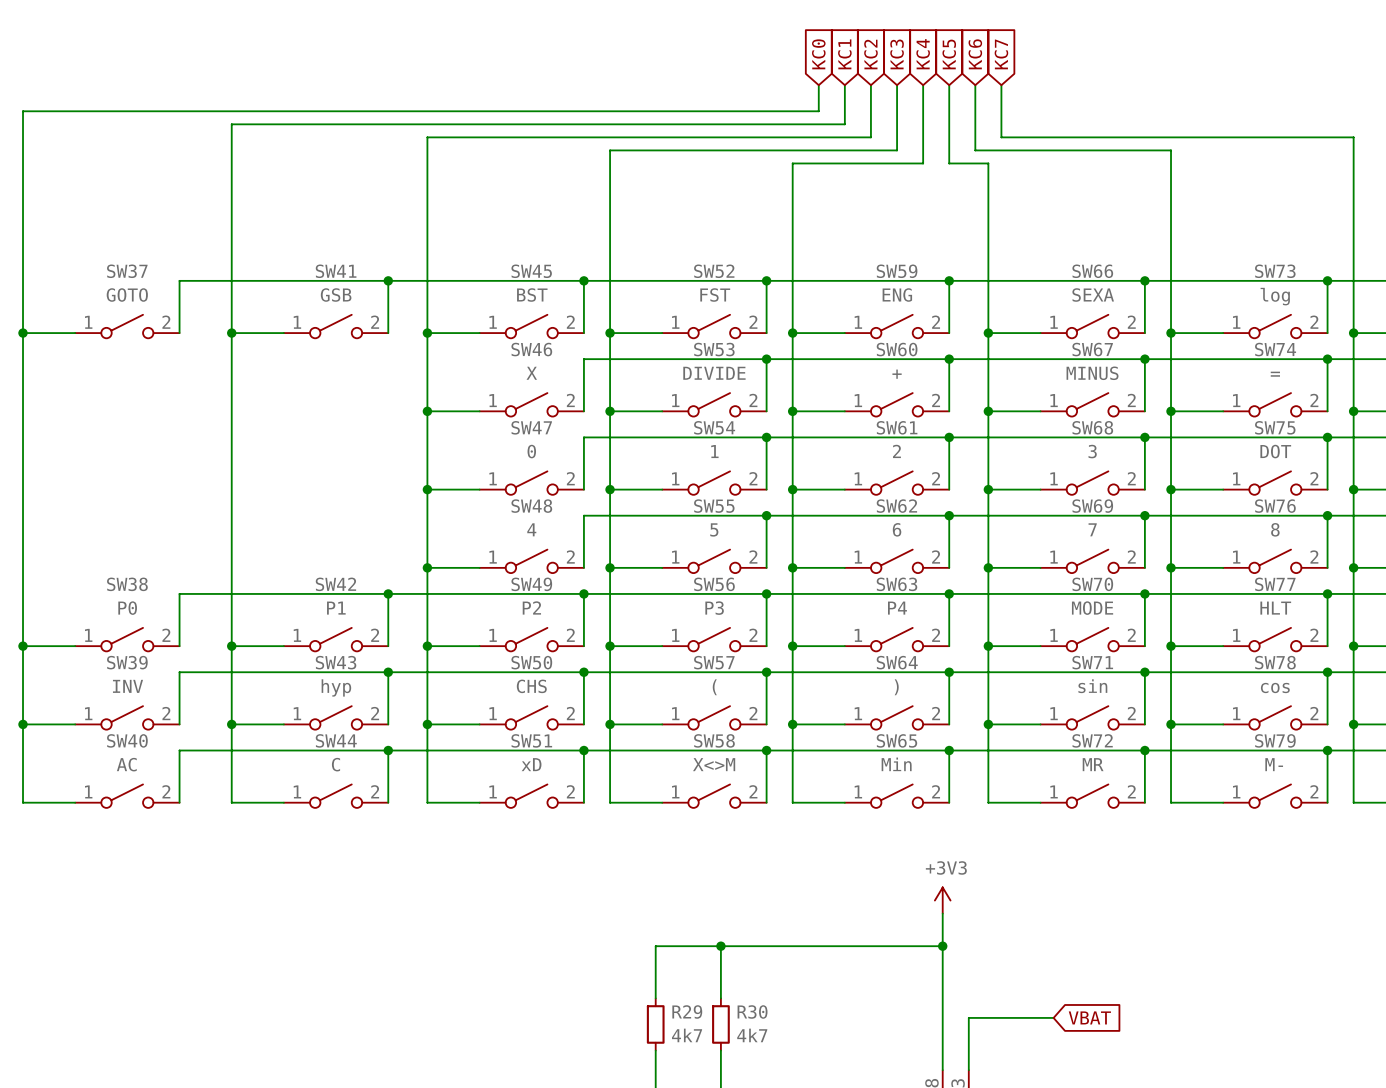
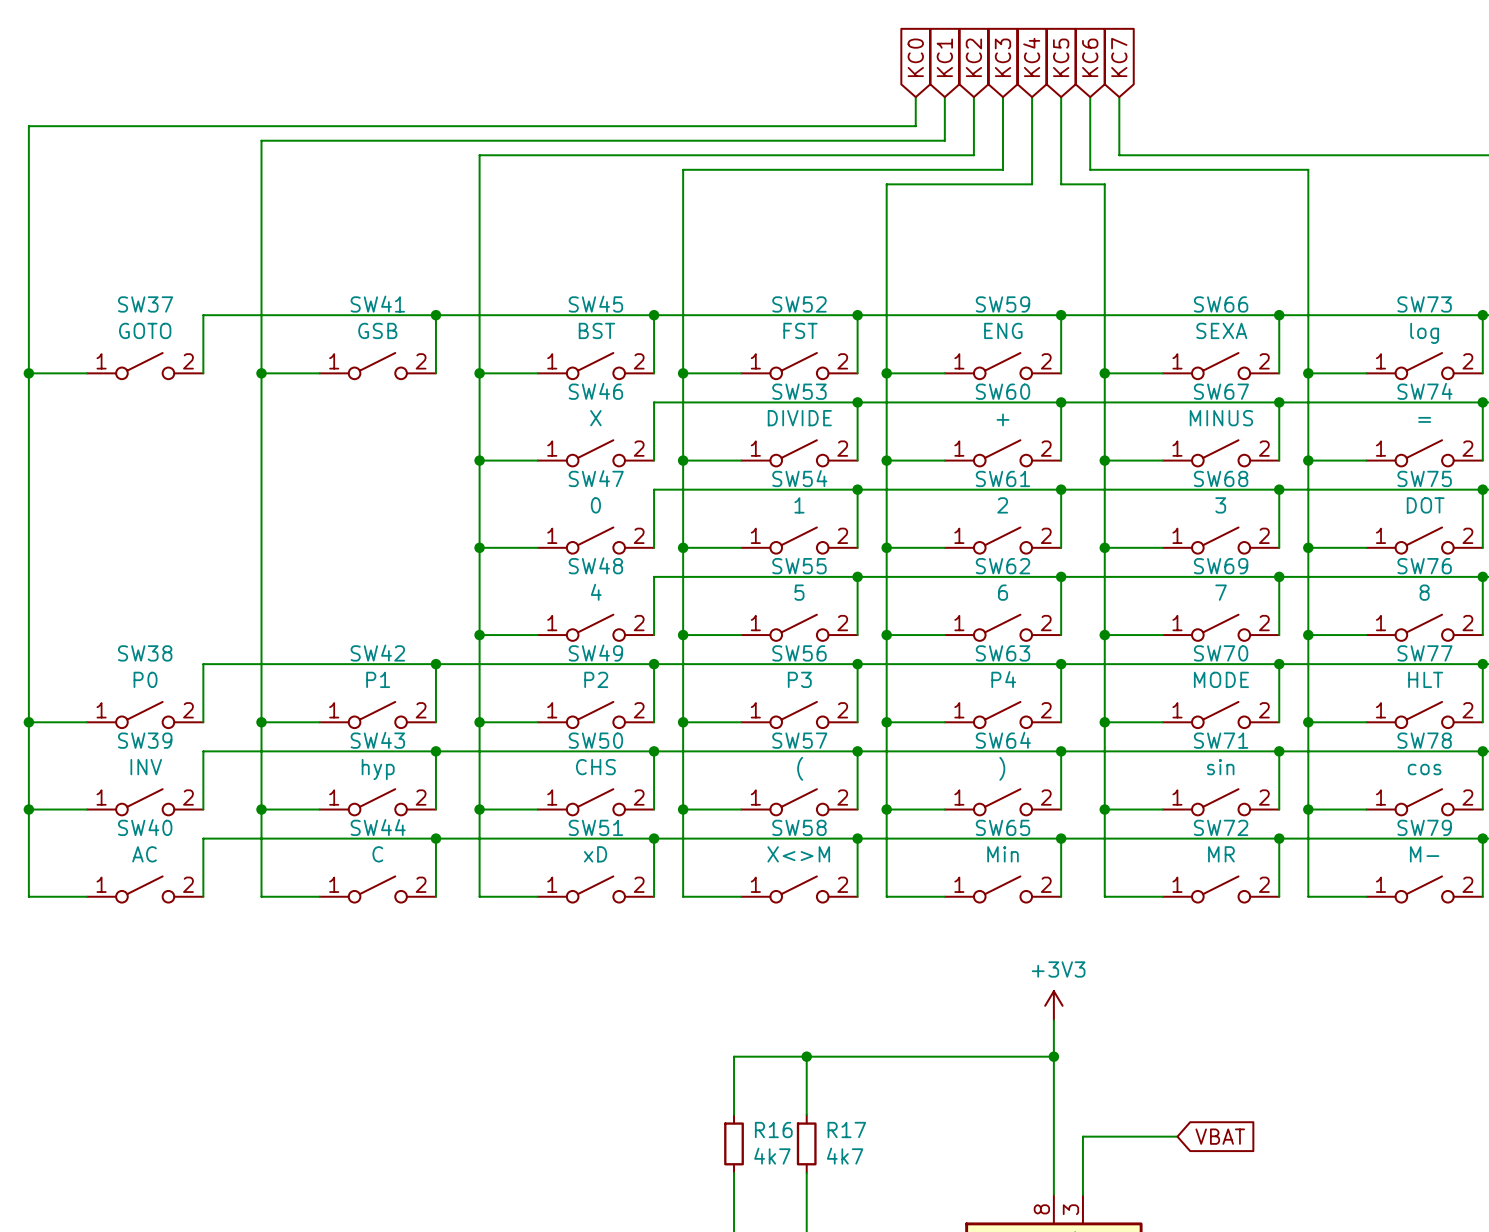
R29 name: R29 (687, 1011) -> R16 (773, 1130)
R30 name: R30 (752, 1011) -> R17 (846, 1130)

